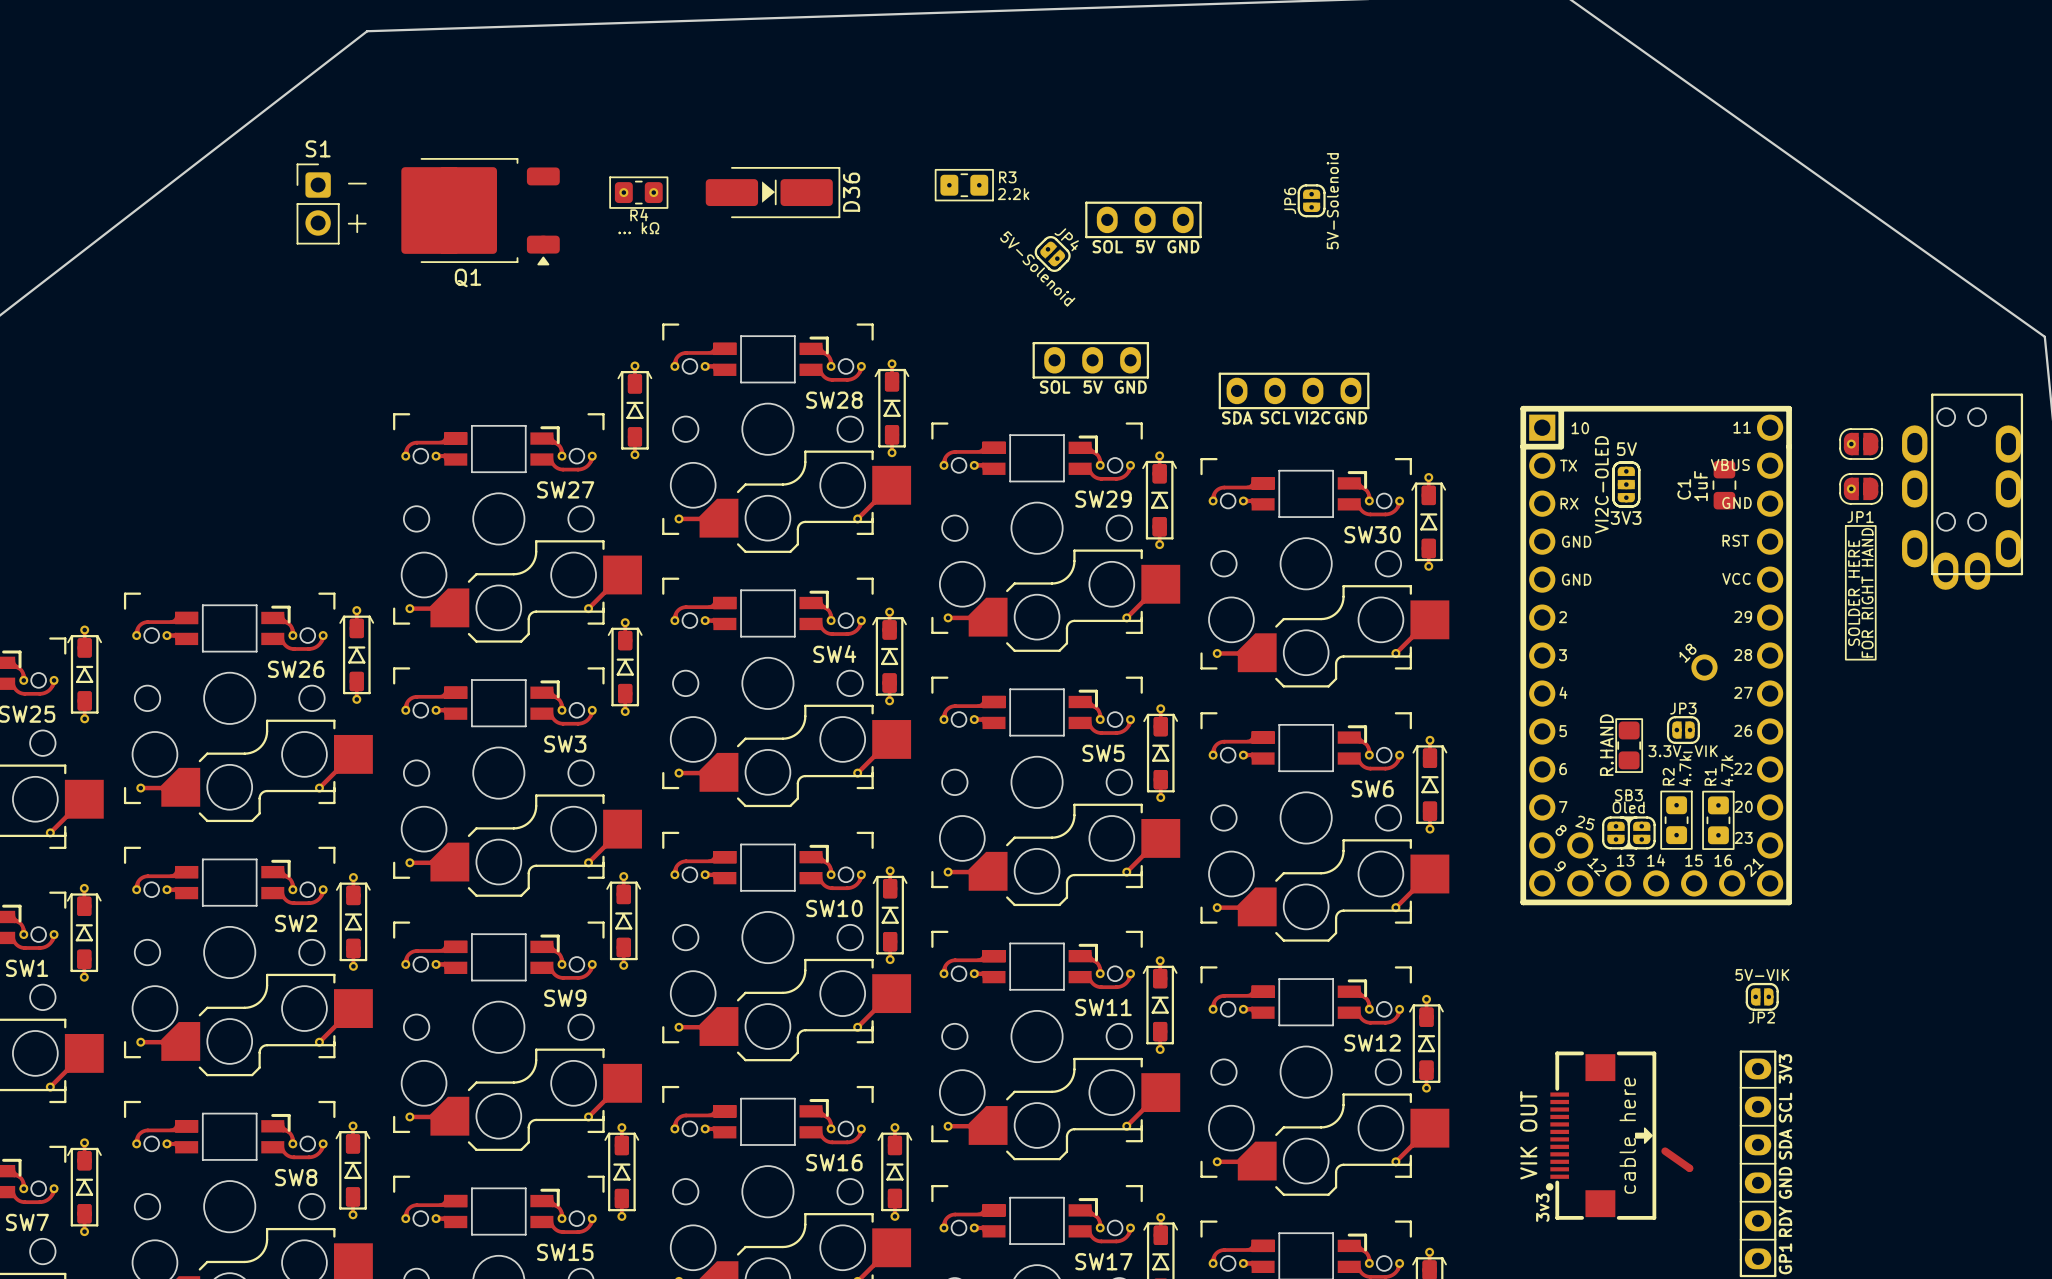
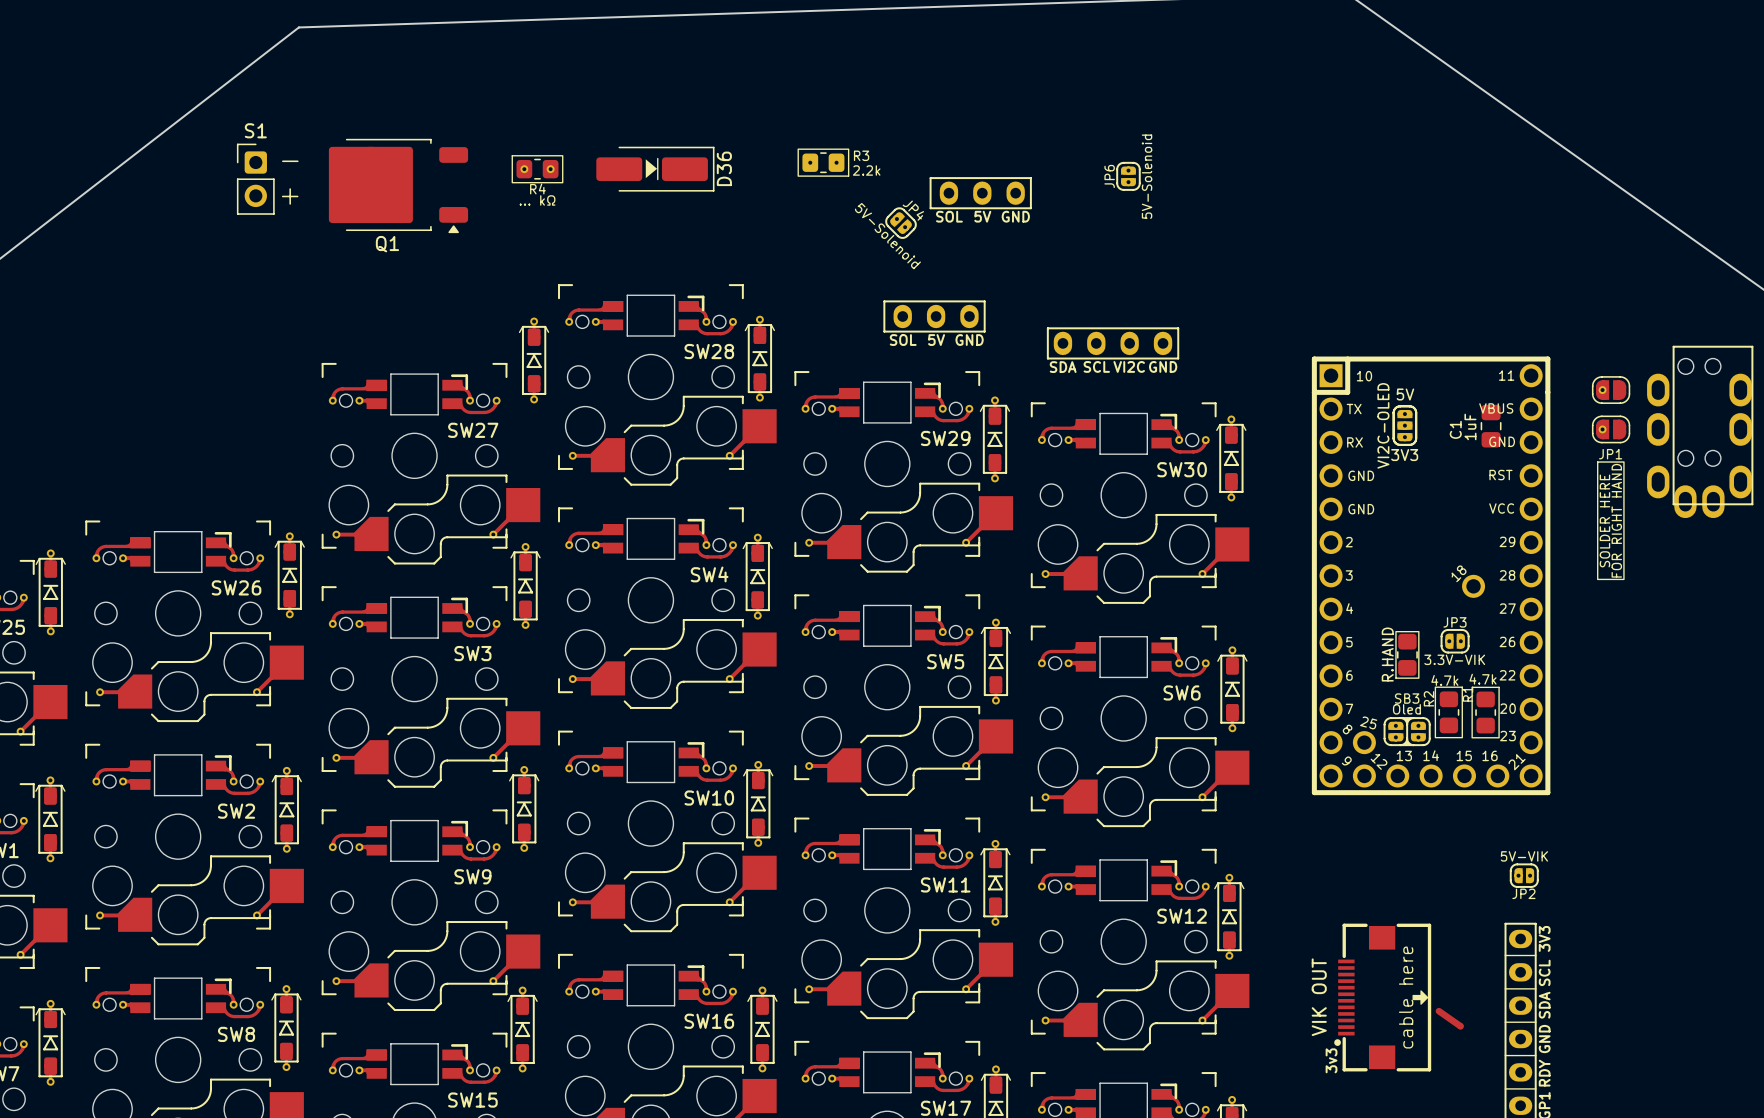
R2 name position: R2 (1668, 776) -> R2 (1429, 698)
R2 footprint: [1660, 790, 1693, 850] -> [1434, 686, 1463, 739]
R1 footprint: [1702, 790, 1735, 850] -> [1471, 686, 1500, 739]

